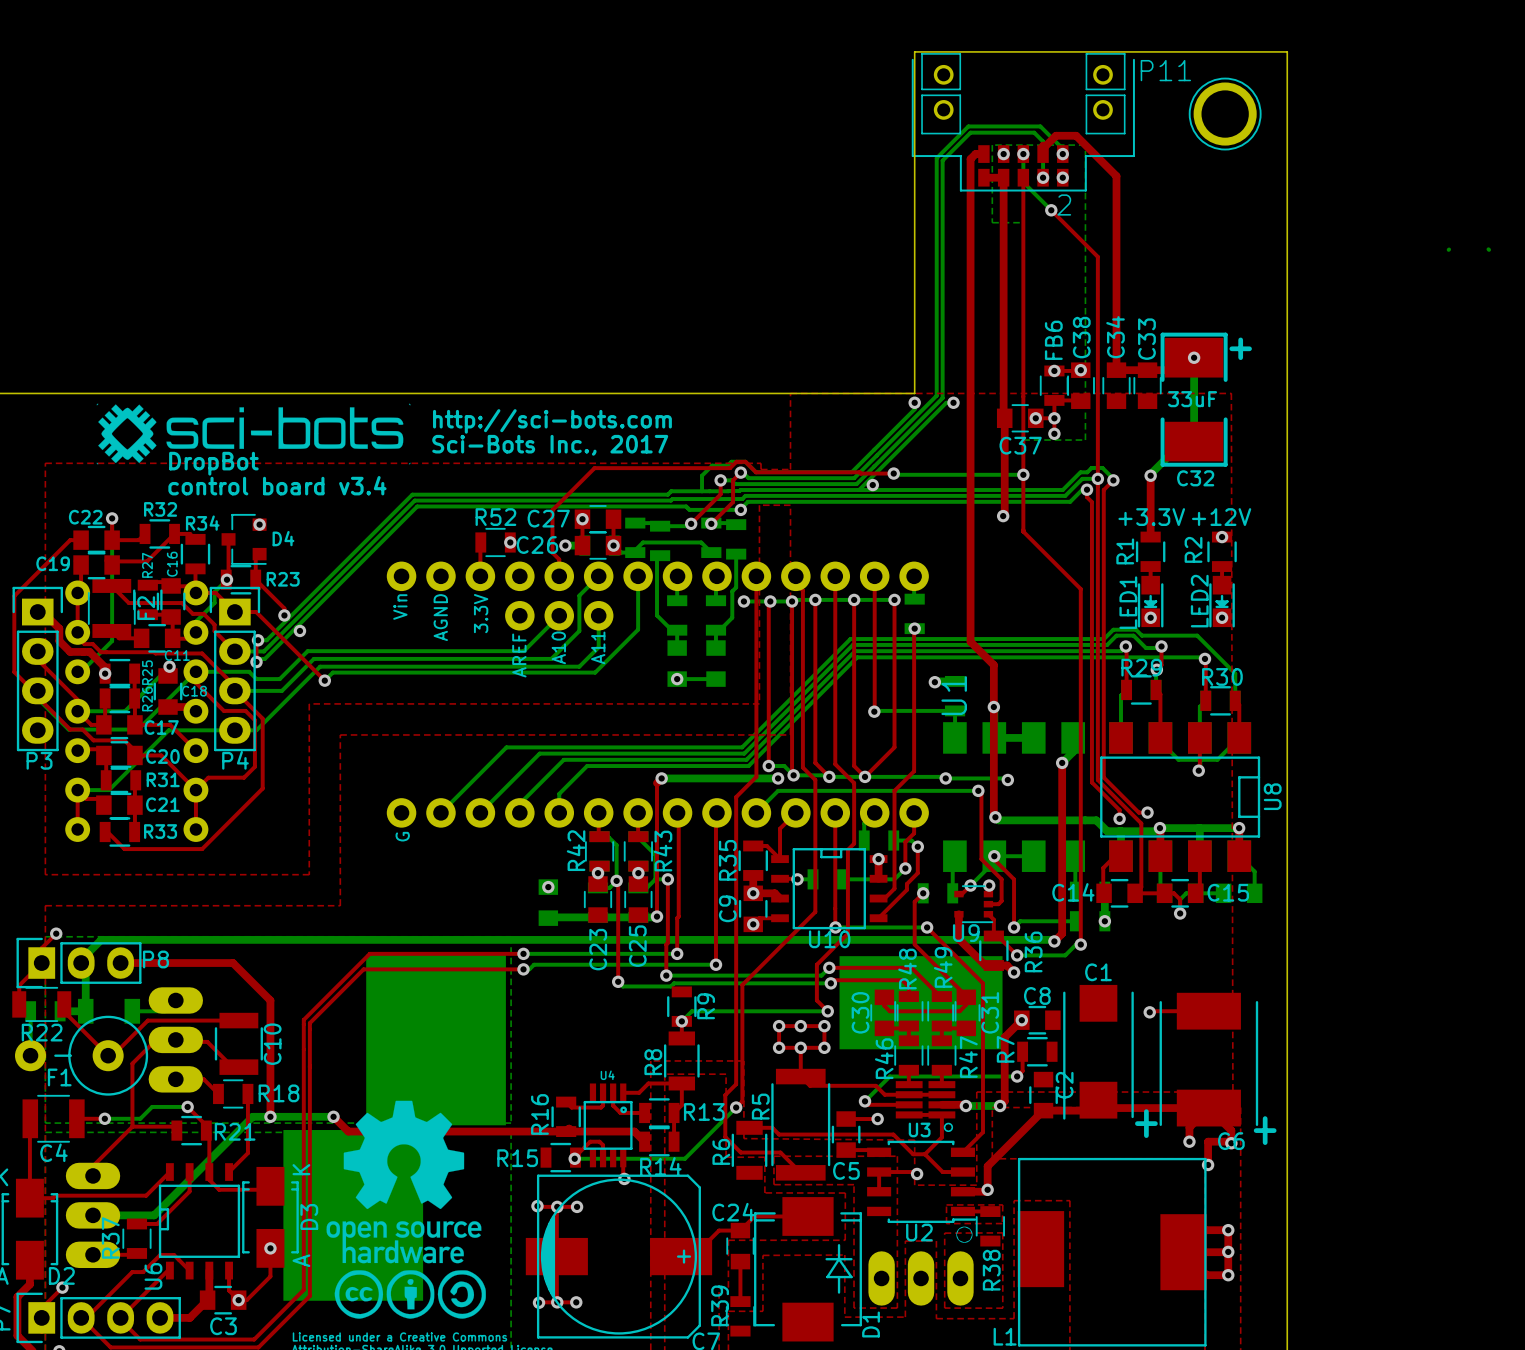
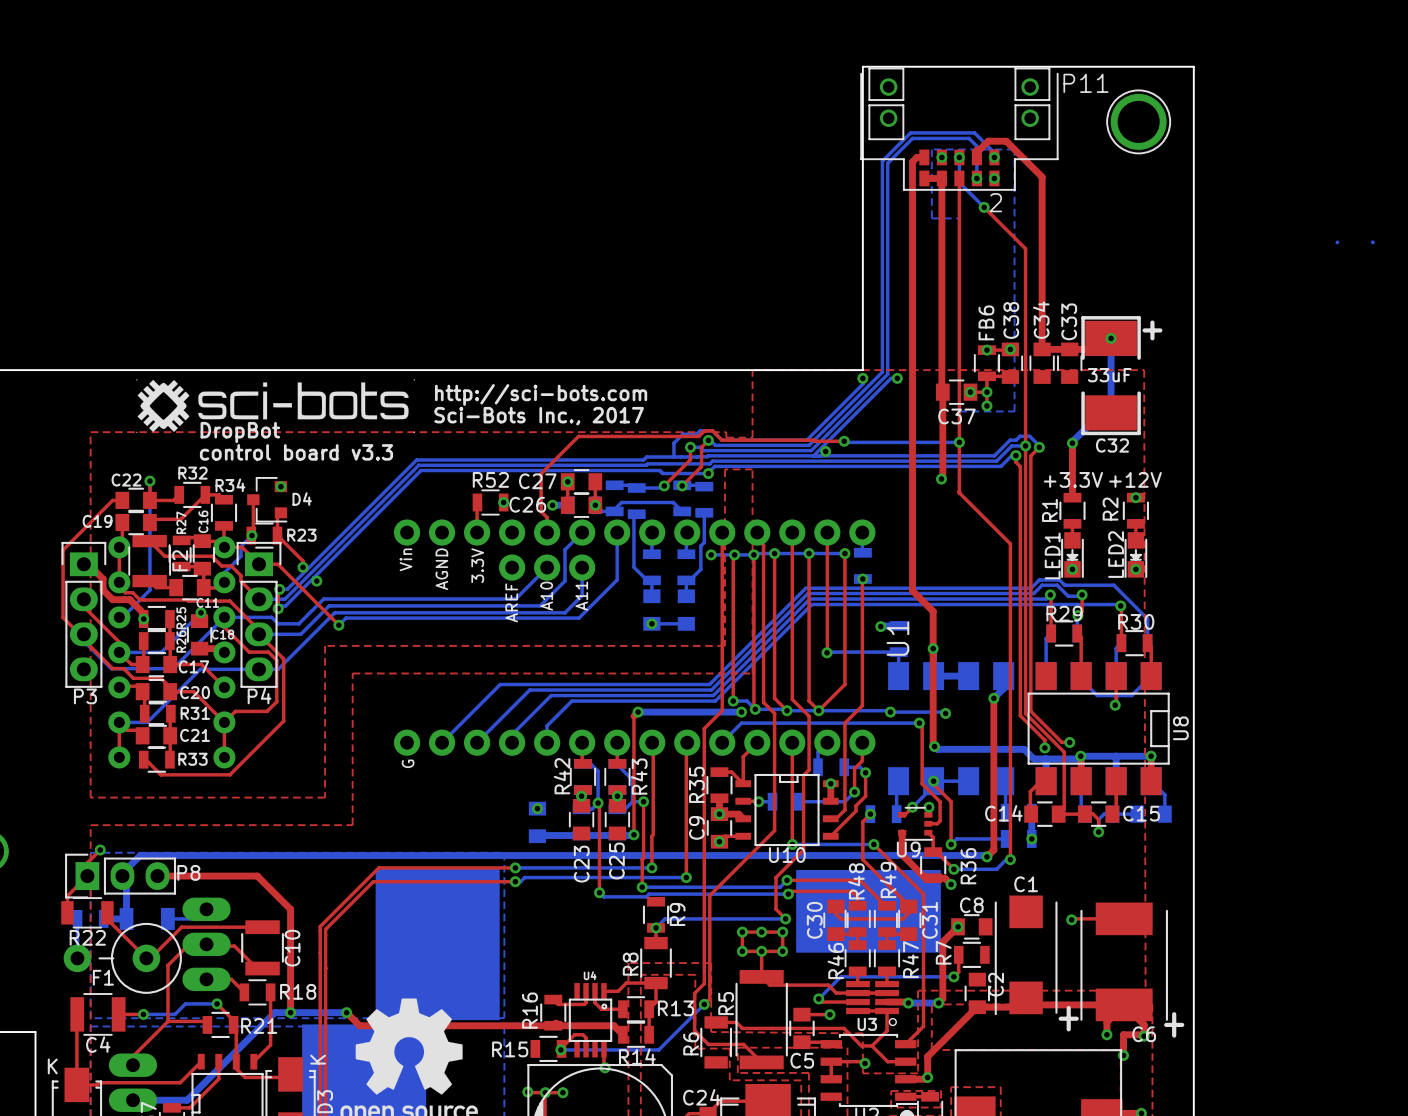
text: control board v3.4 (277, 485) -> control board v3.3 (296, 452)

